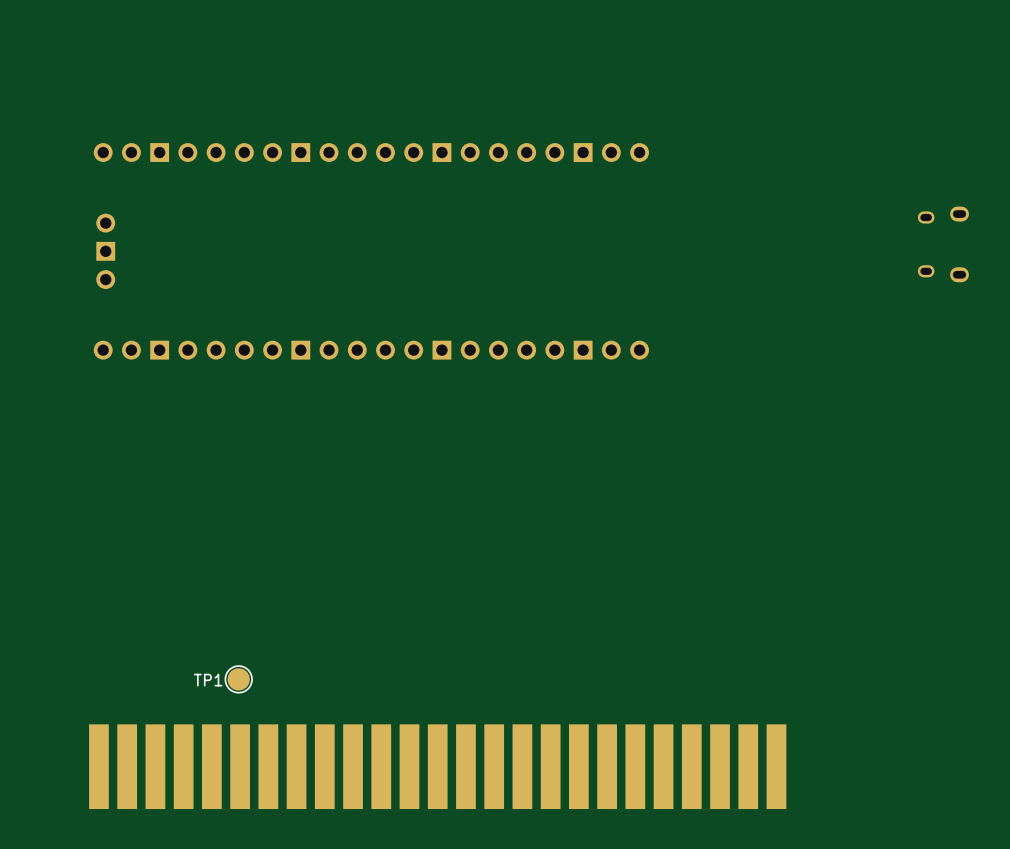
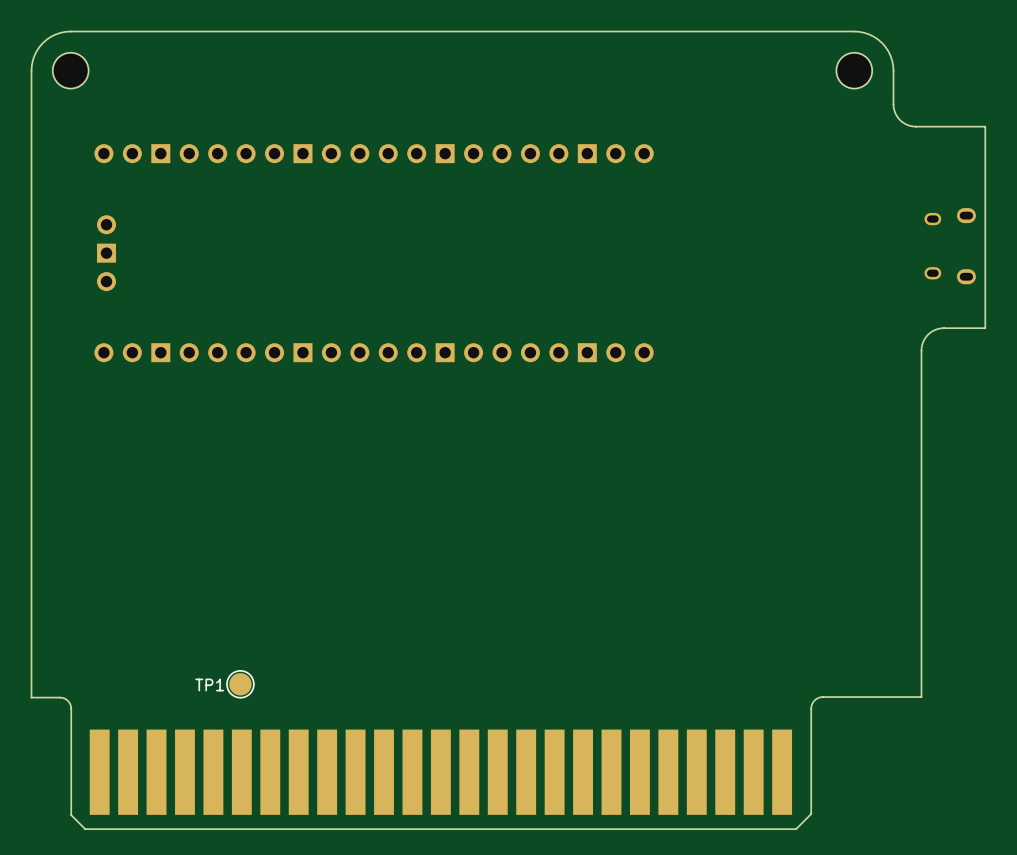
board edge: none -> (854, 31) (70, 31) (55, 34) (42, 42) (34, 55) (31, 70) (31, 697) (61, 697) (70, 704) (71, 815) (85, 829) (796, 829) (811, 814) (811, 708) (814, 700) (822, 697) (921, 697) (921, 347) (926, 336) (938, 328) (985, 328) (985, 126) (915, 126) (902, 122) (896, 115) (893, 107) (893, 65) (888, 51) (873, 36) (854, 31)
part: none -> (70, 70)
part: none -> (854, 70)

